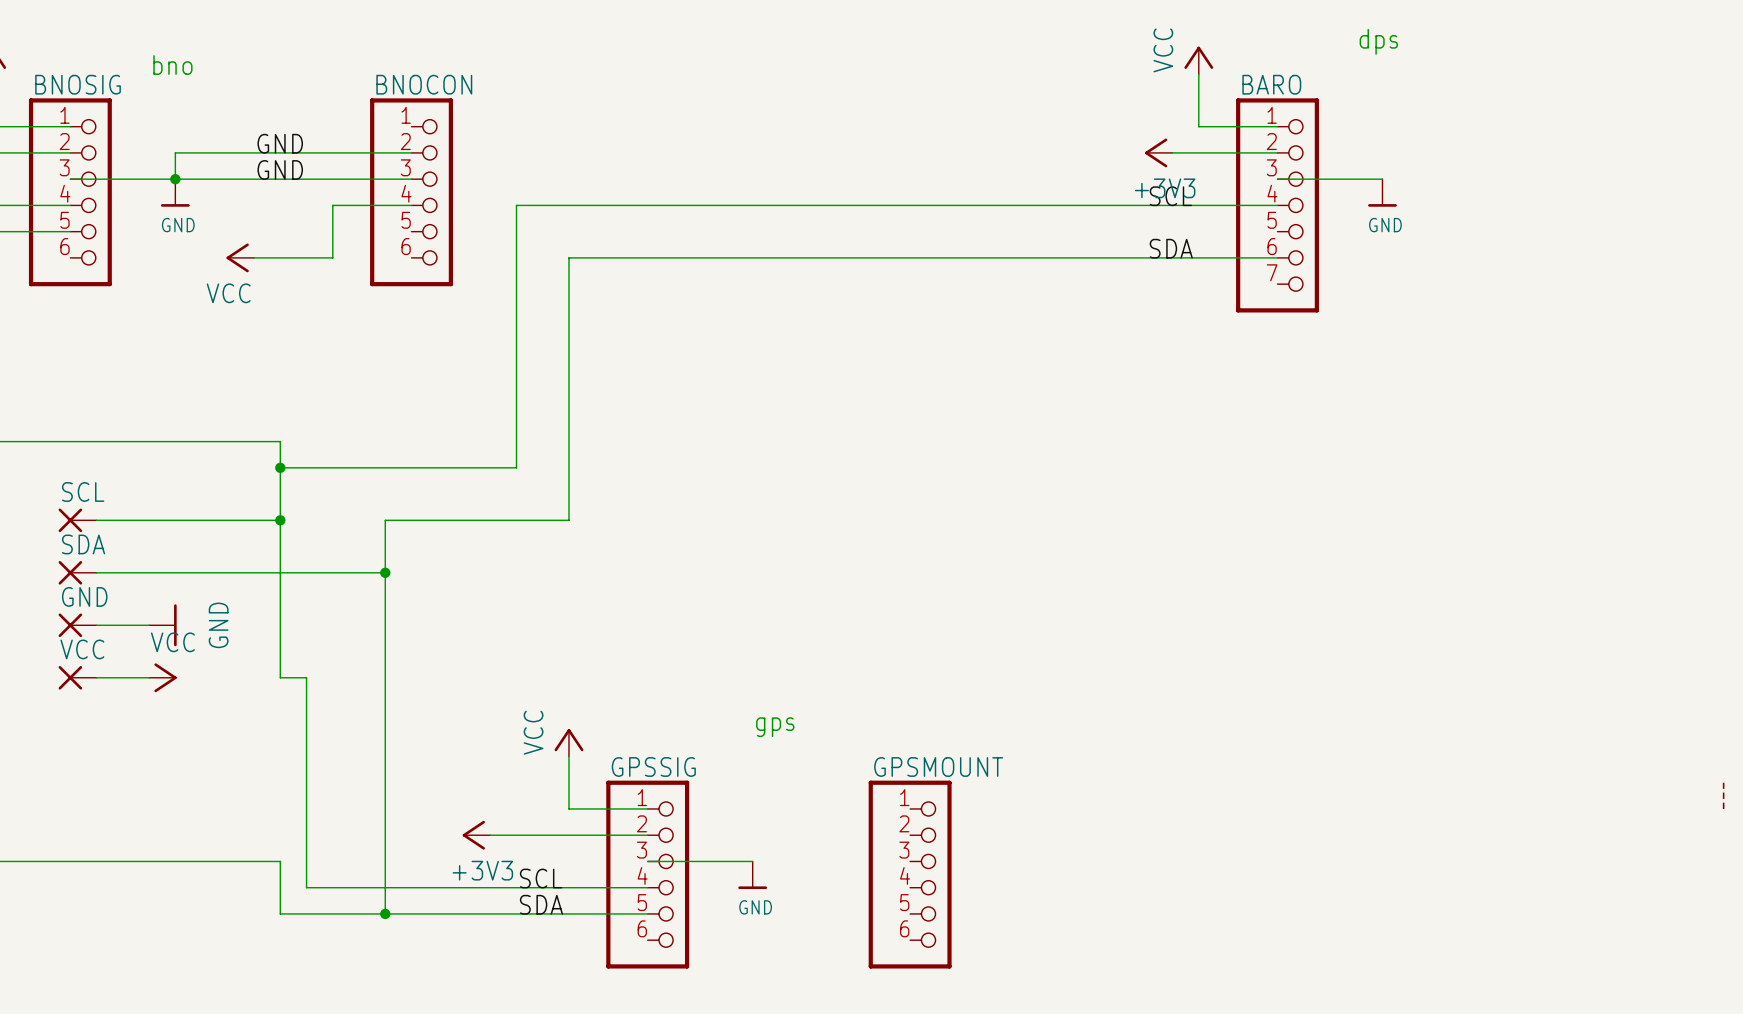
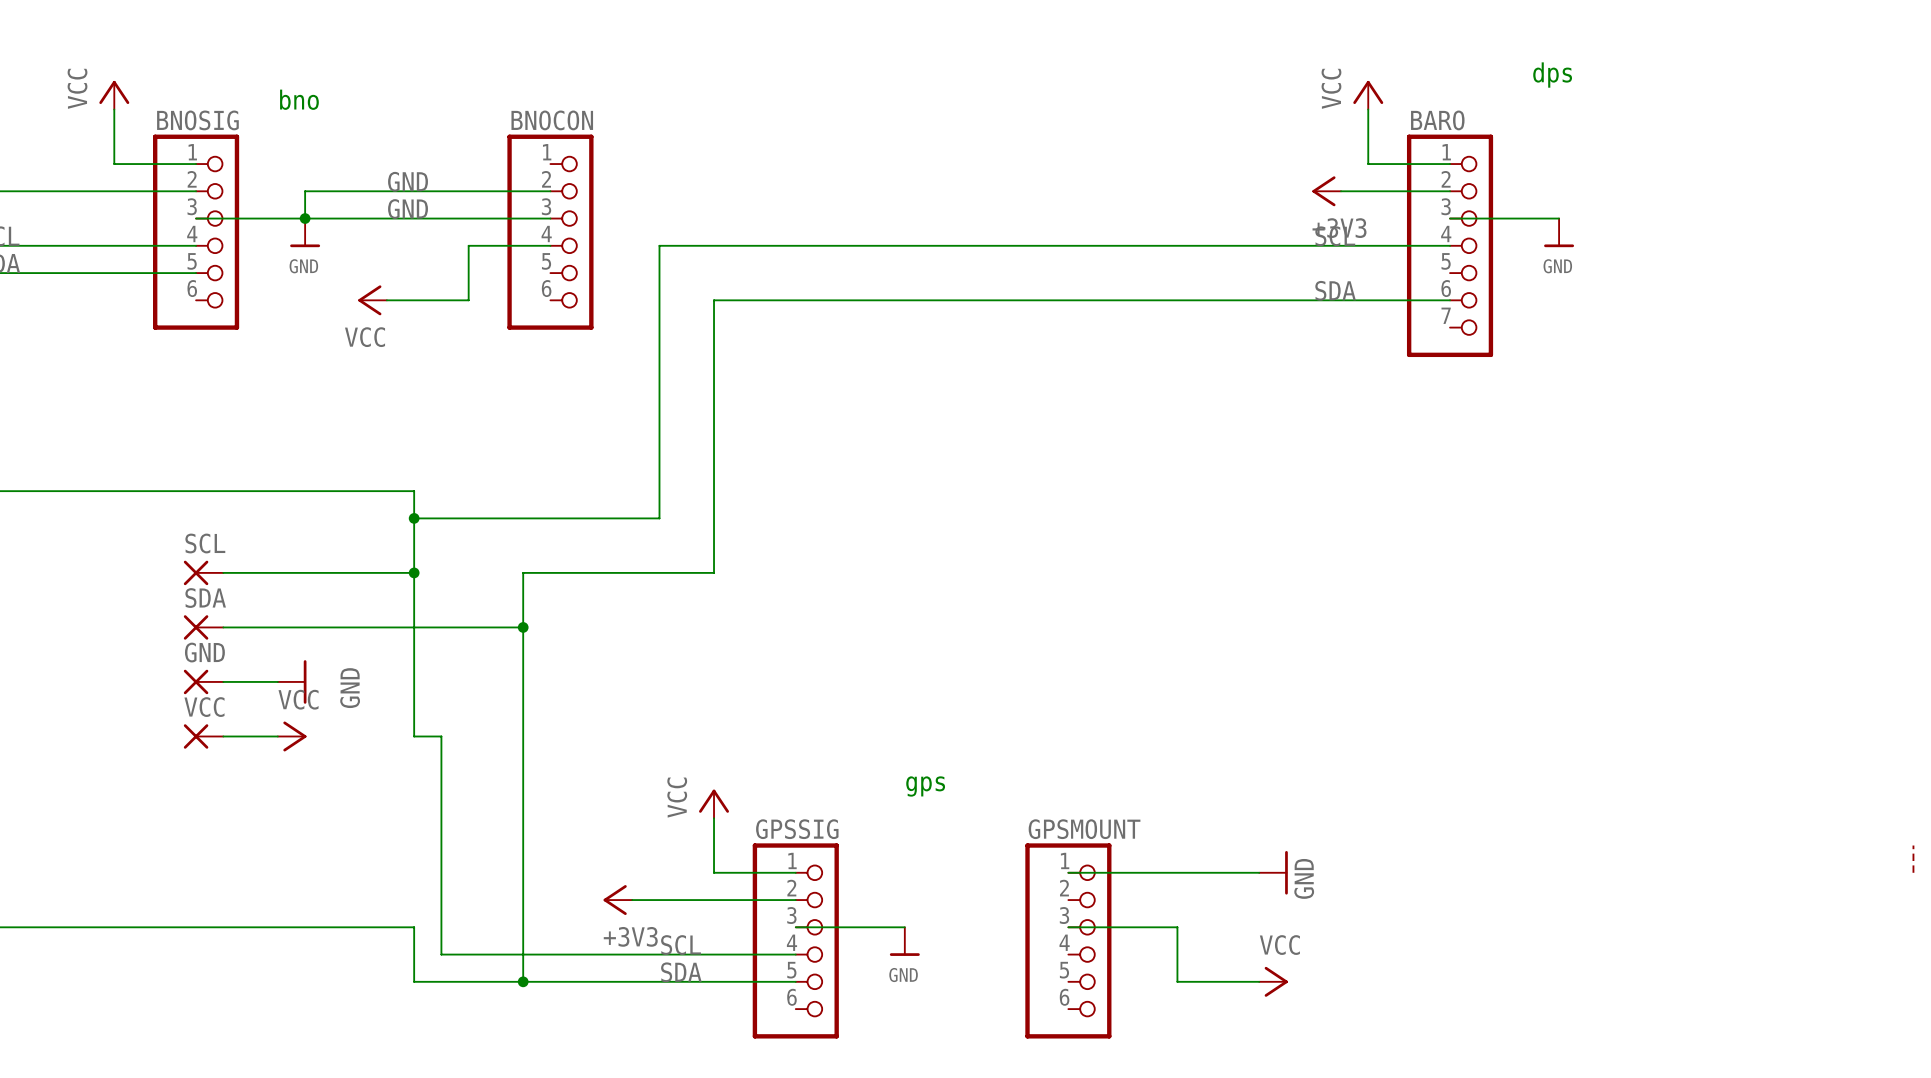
wire: none -> (1068, 872) (1259, 872)
power symbol: none -> GND (1273, 872)
wire: none -> (1068, 927) (1177, 927) (1177, 981) (1259, 981)
power symbol: none -> VCC (1273, 981)

